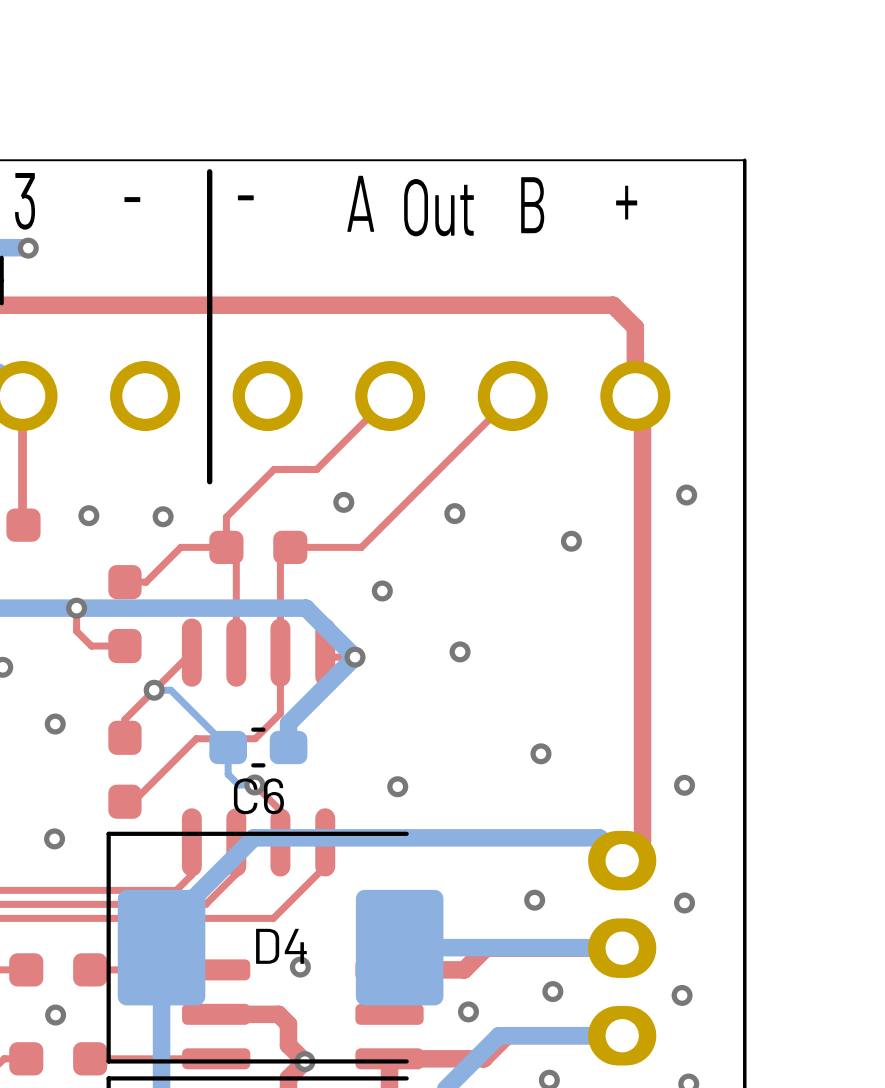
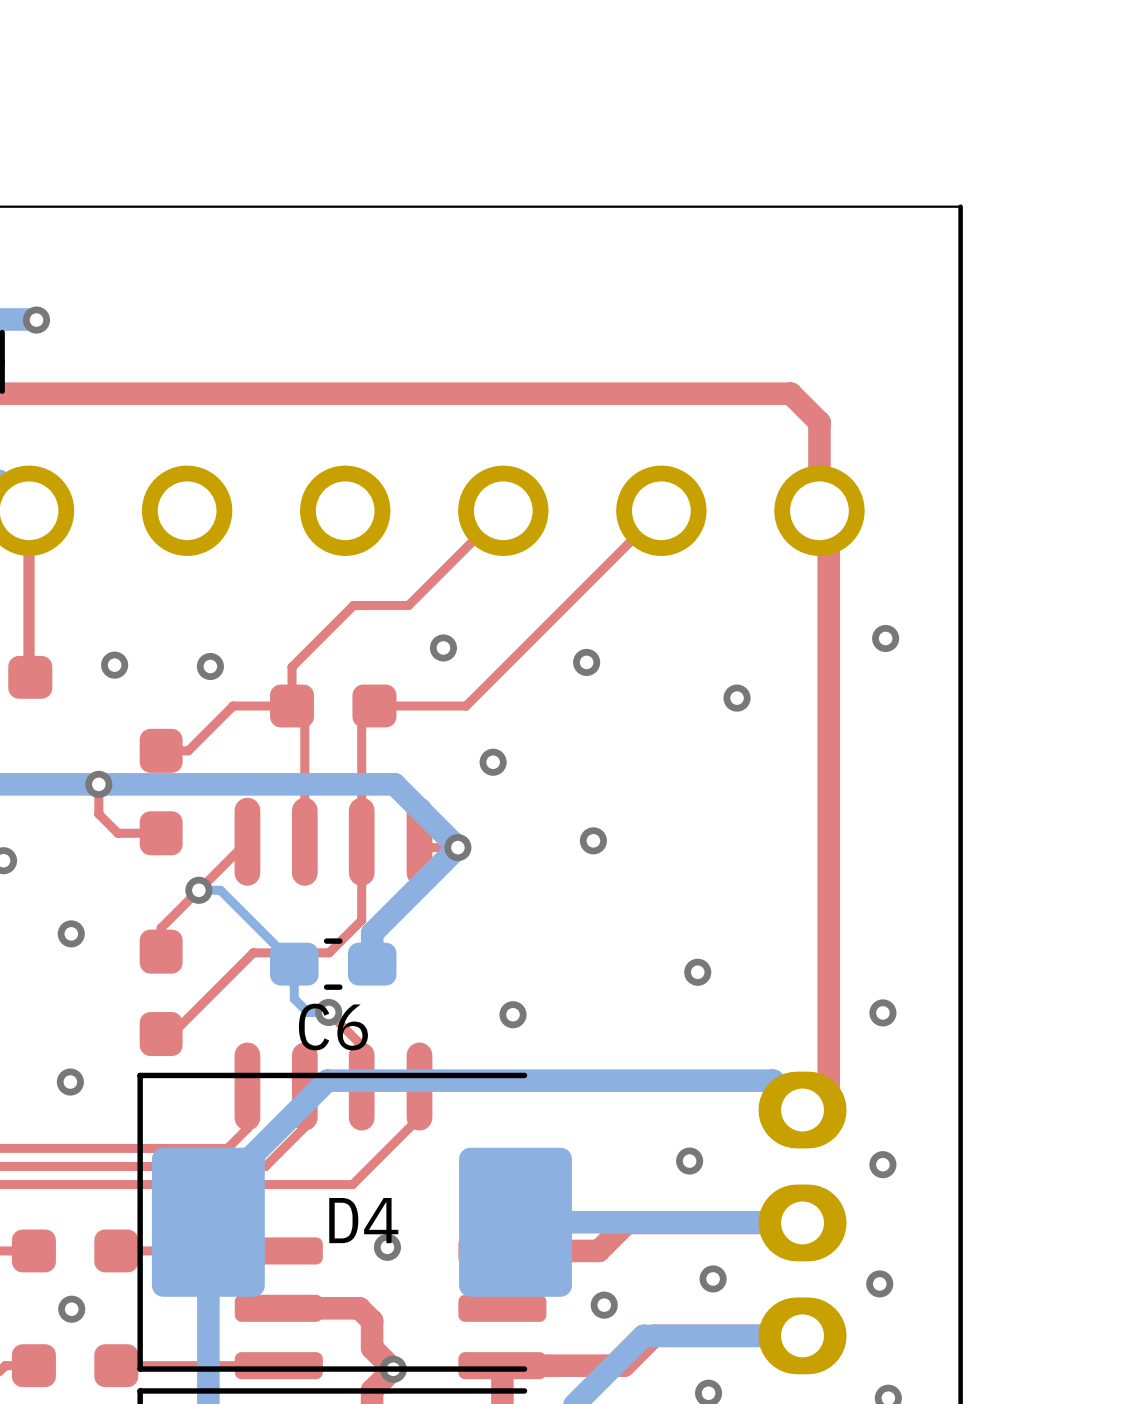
line: (209, 171) (209, 481) -> none
text: - (245, 197) -> none
text: - (132, 199) -> none
text: 3 (25, 201) -> none
text: + (626, 202) -> none
text: A (360, 203) -> none
text: B (532, 205) -> none
text: Out (438, 207) -> none

